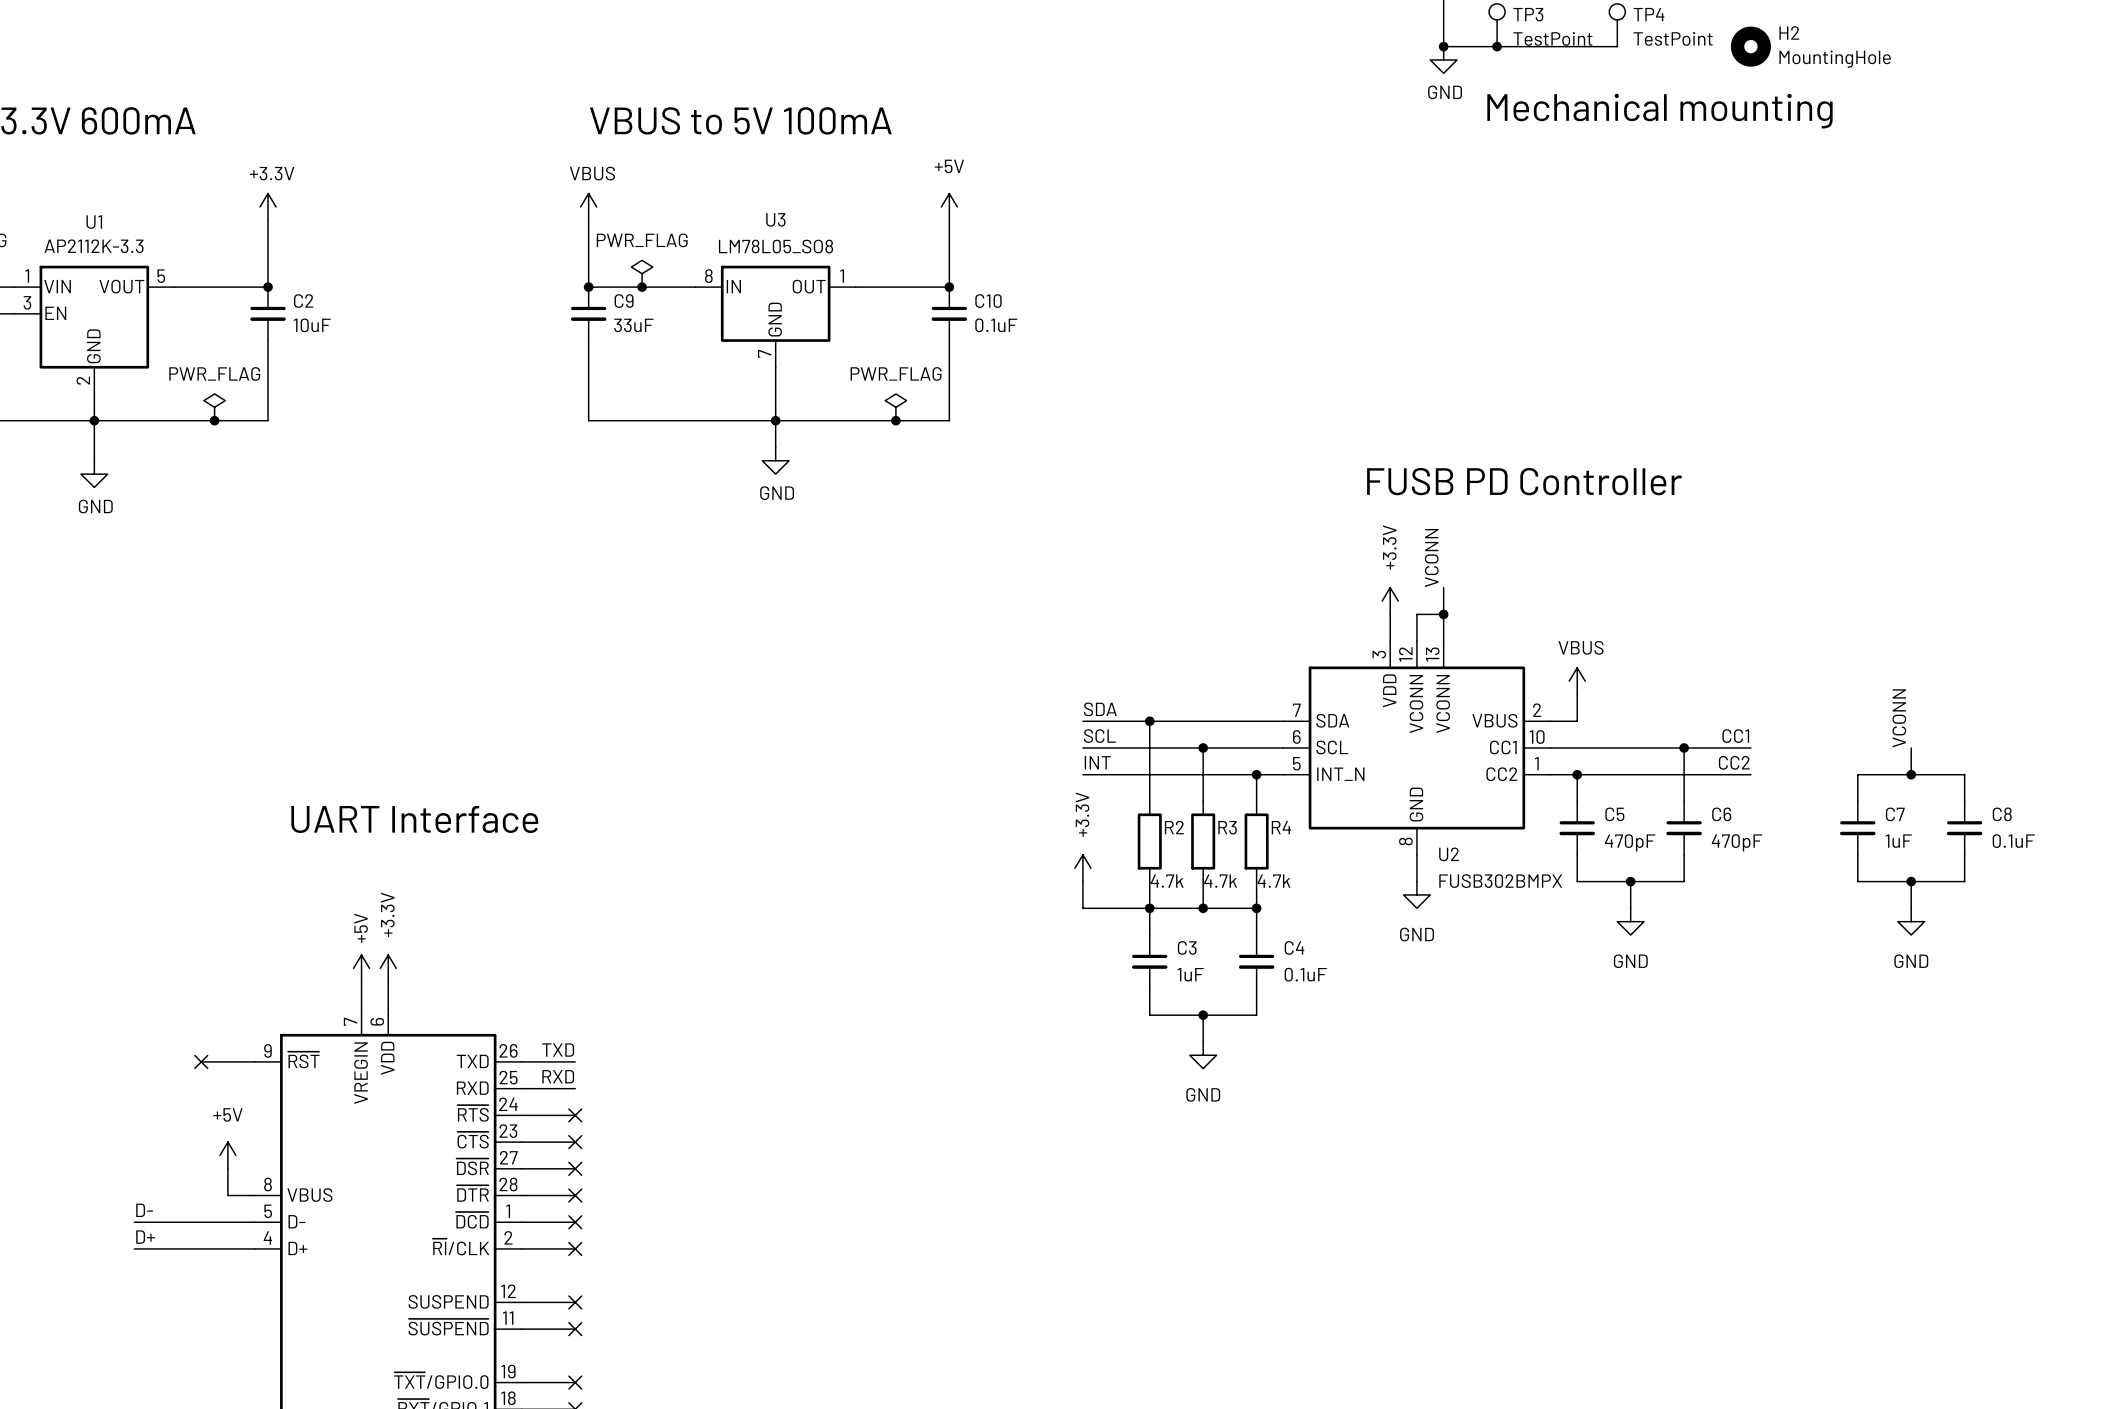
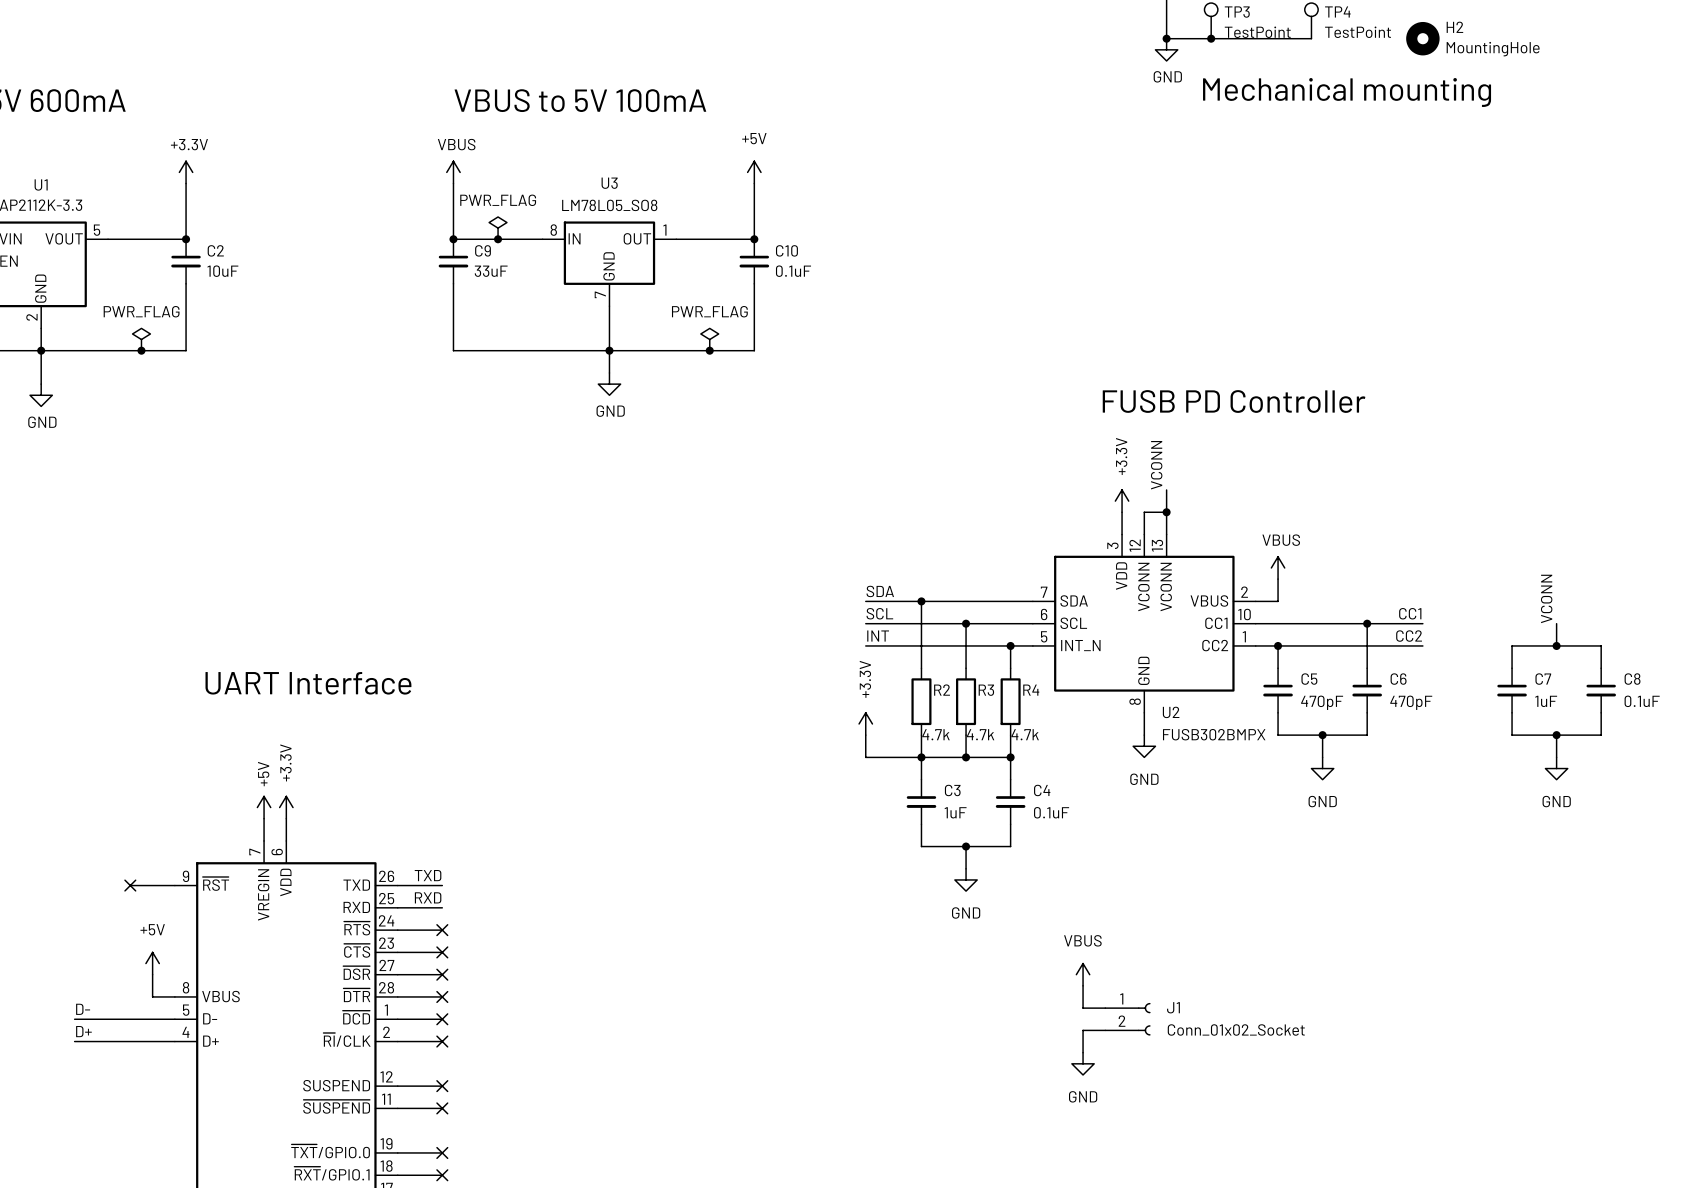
power symbol: none -> VBUS (1083, 974)
wire: none -> (1083, 985) (1083, 1008) (1105, 1008)
J1: none -> Conn_01x02_Socket (1127, 1019)
wire: none -> (1105, 1030) (1083, 1030) (1083, 1052)
power symbol: none -> GND (1083, 1063)

